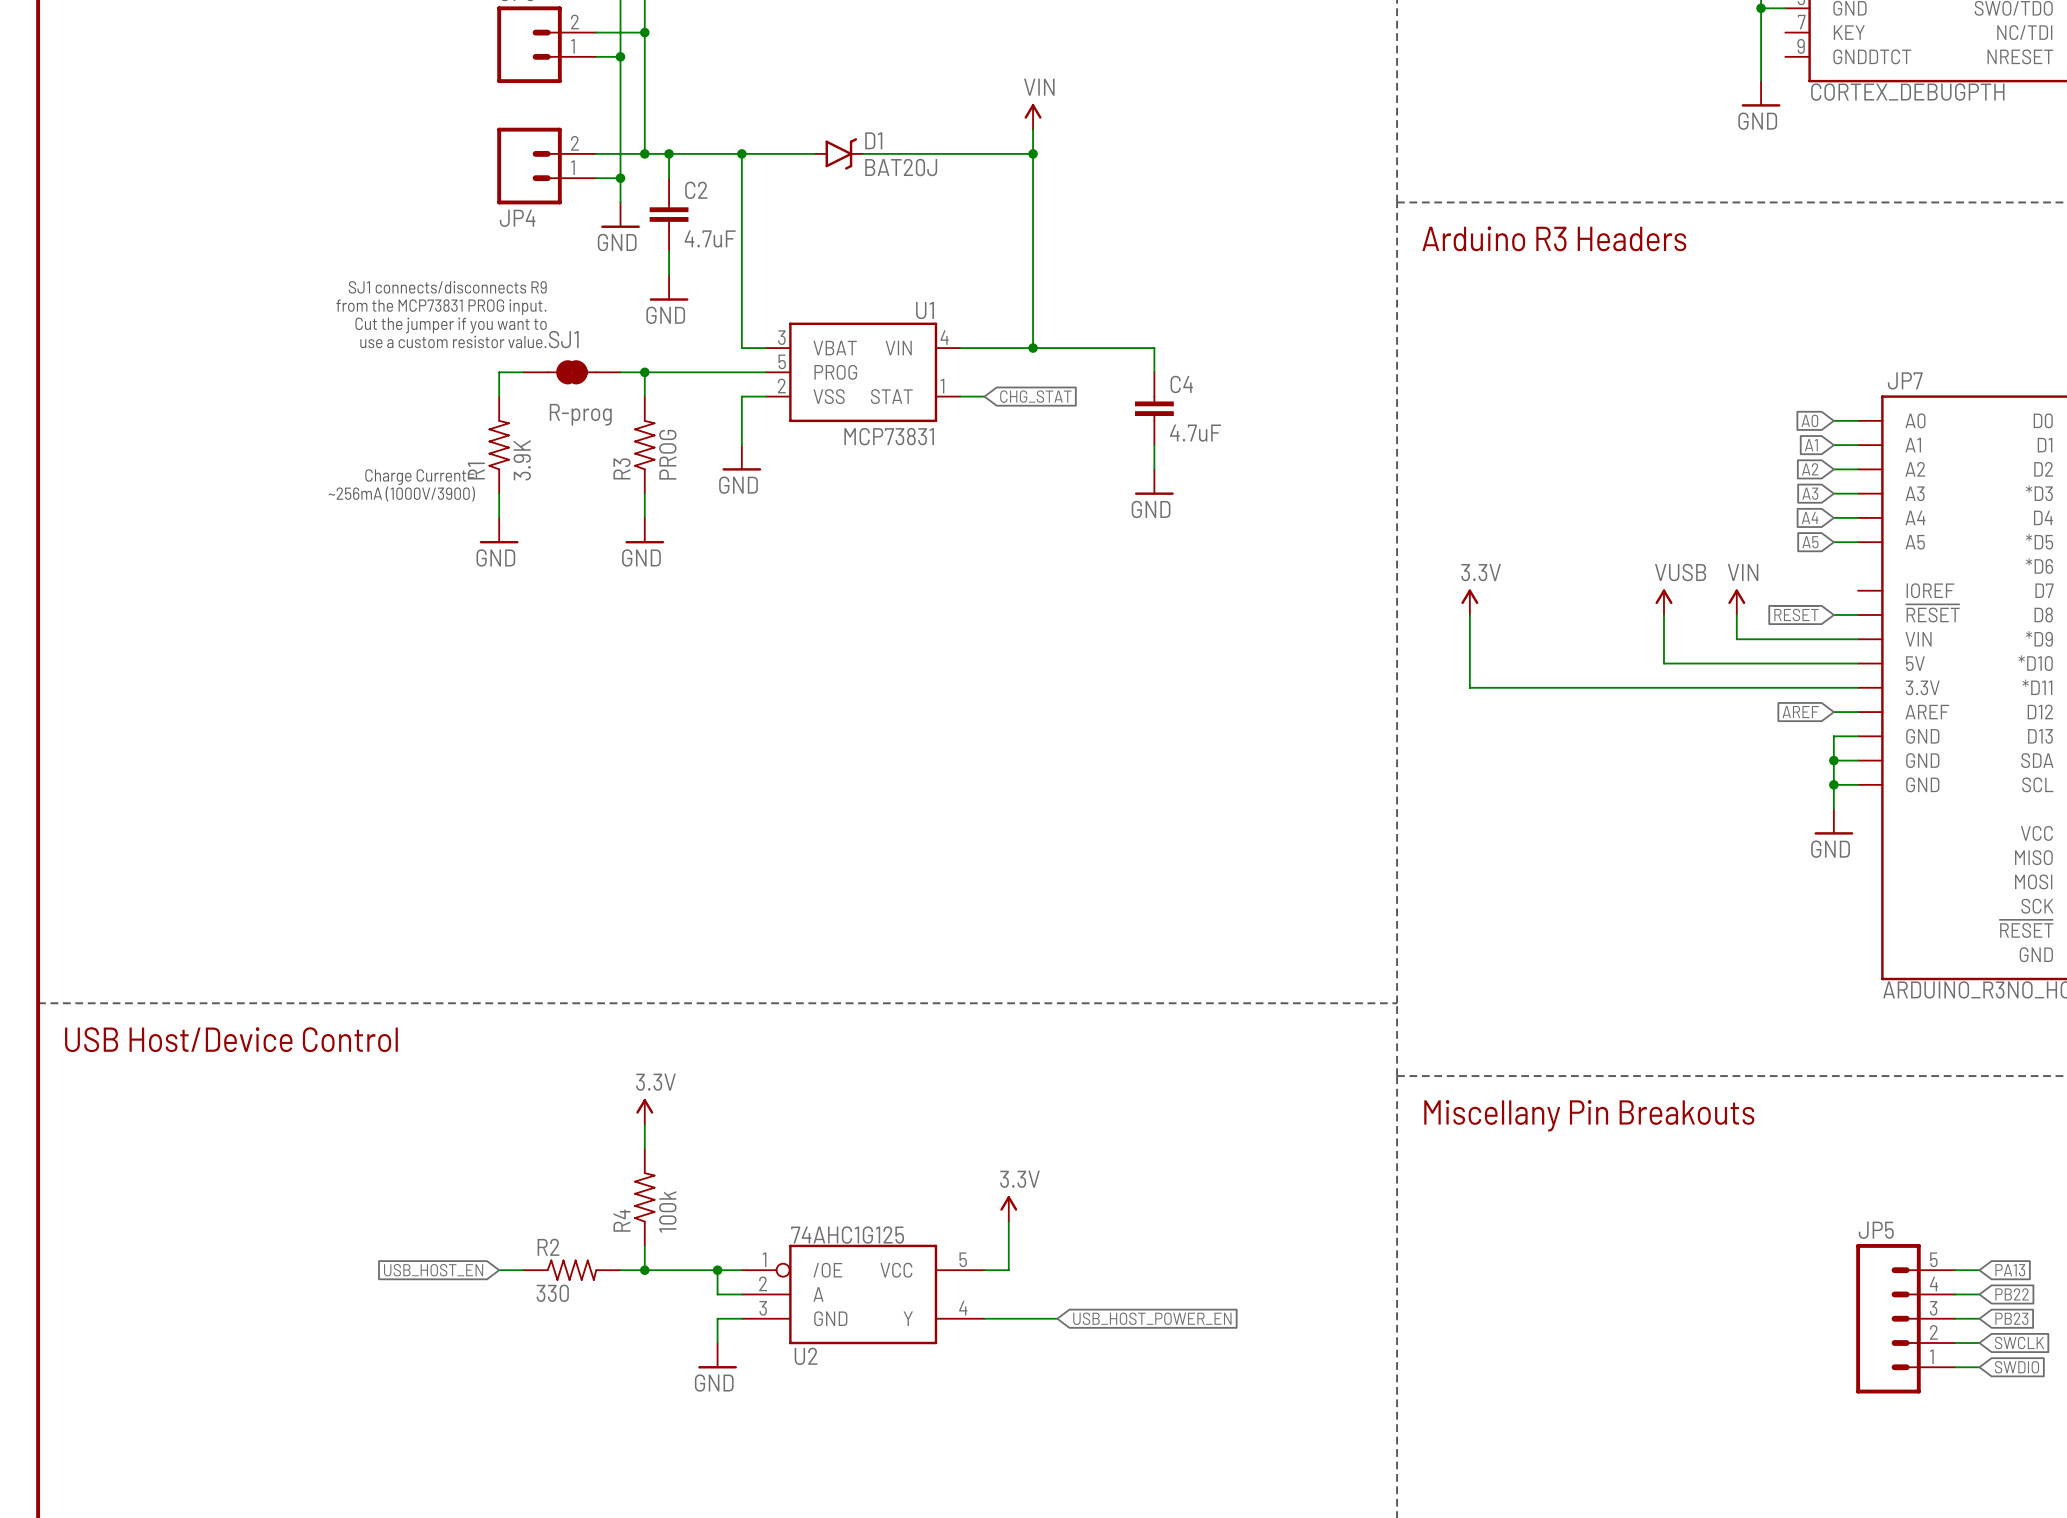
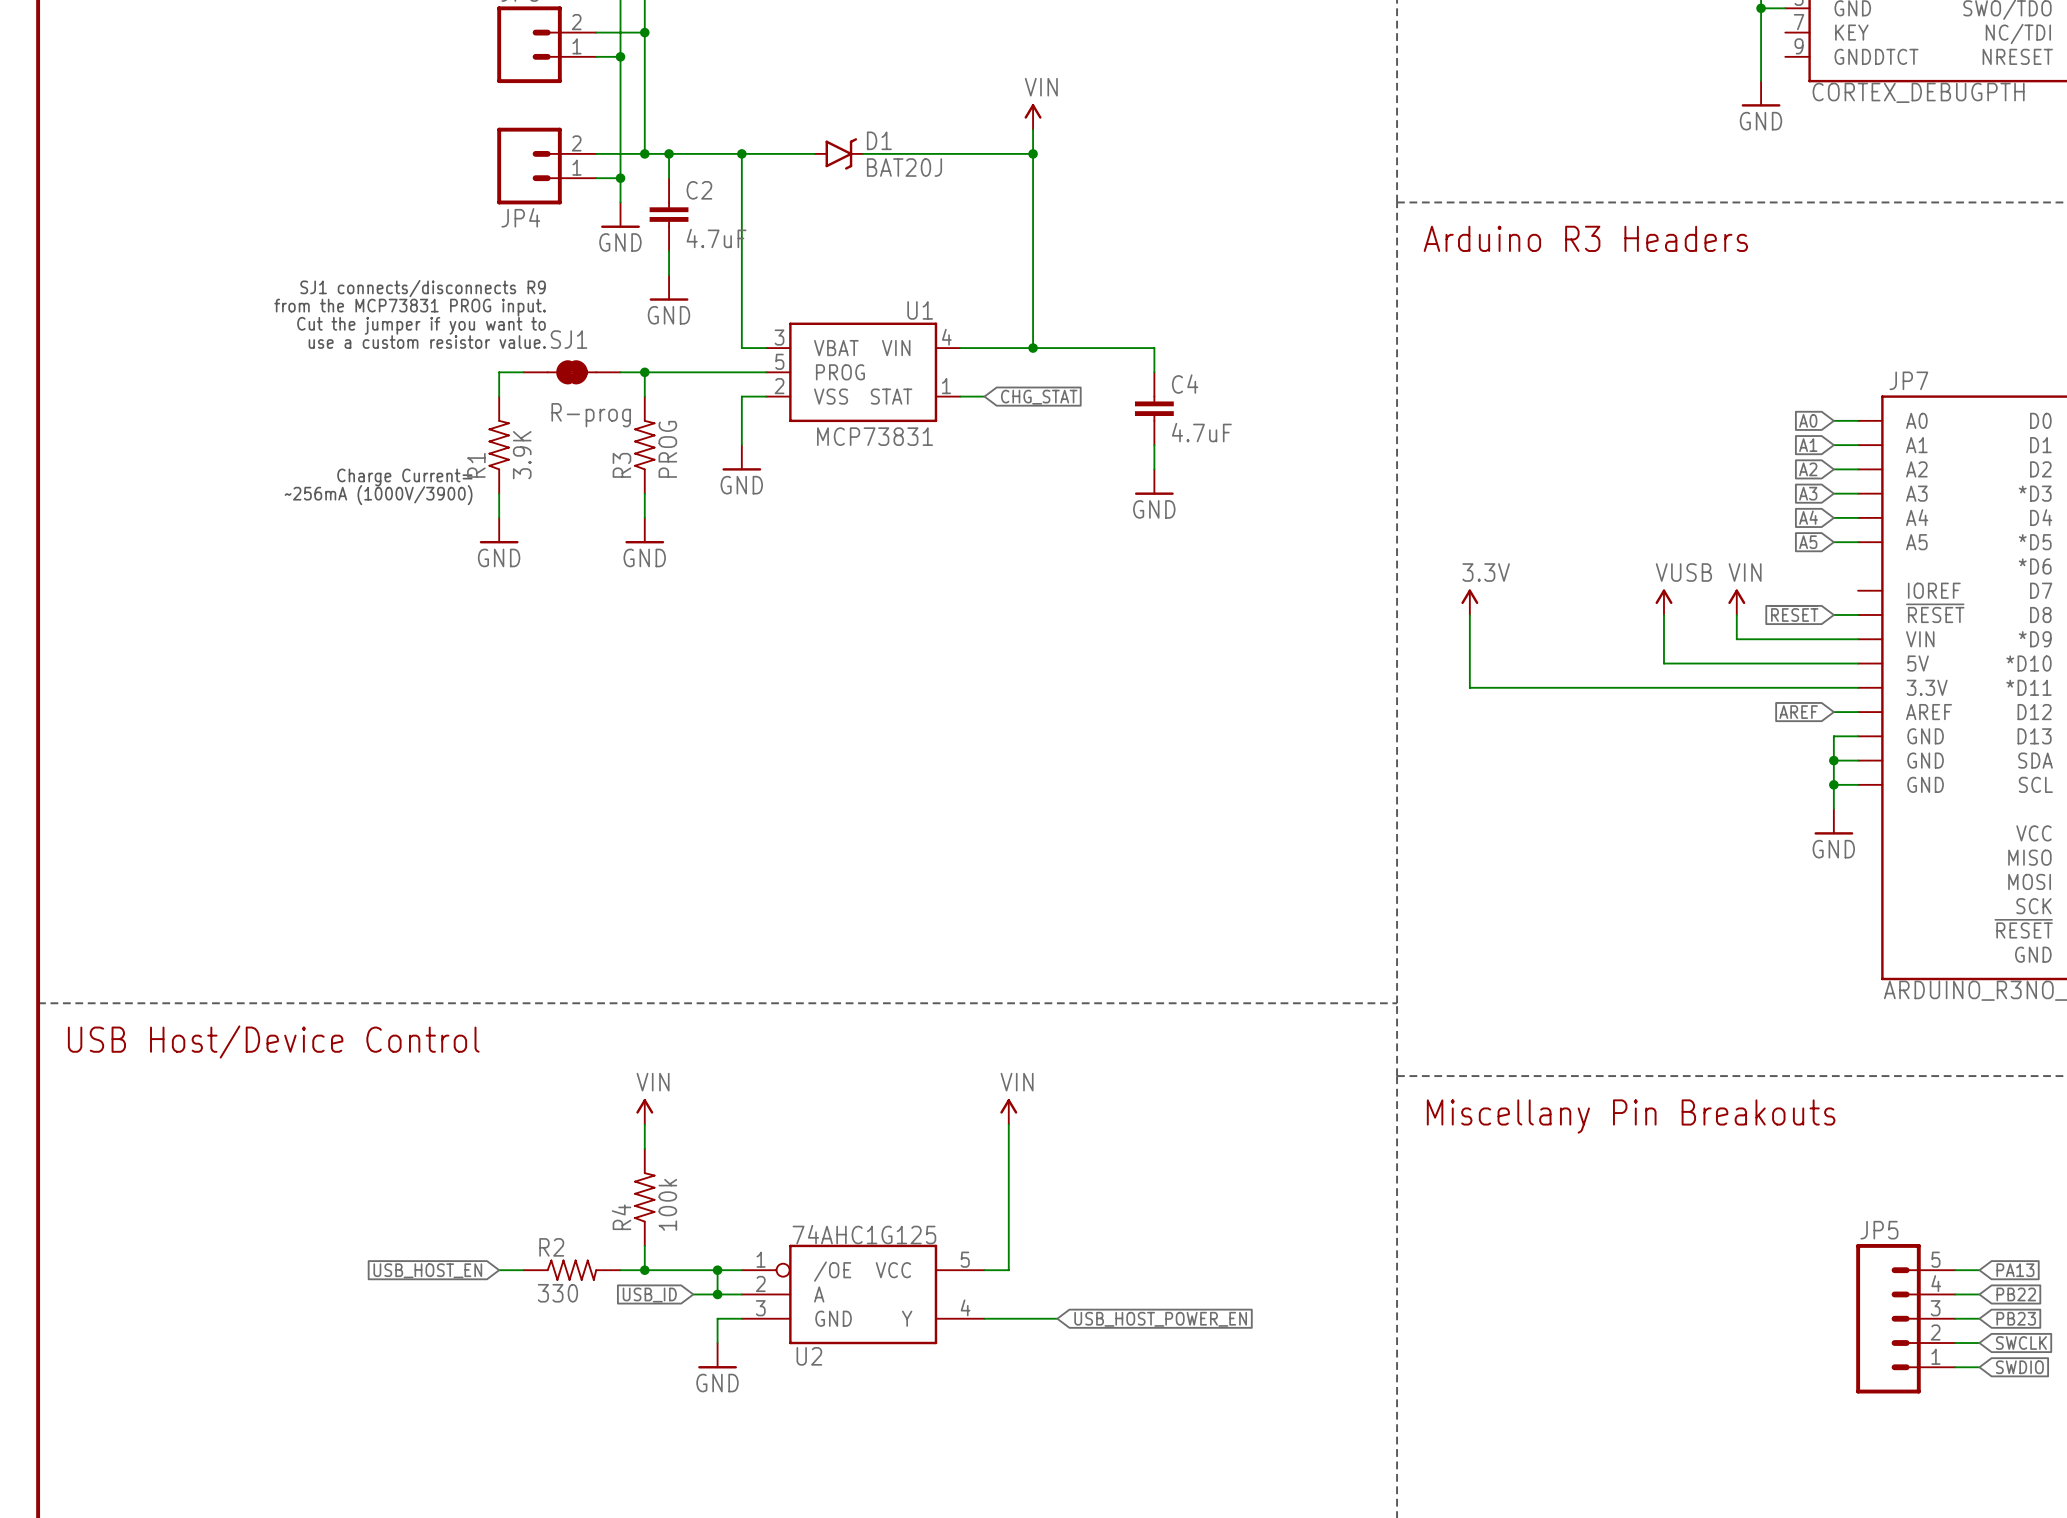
power symbol: 3.3V (644, 1111) -> VIN (644, 1111)
power symbol: none -> VIN (1008, 1111)
wire: none -> (1008, 1124) (1008, 1221)
power symbol: 3.3V (1008, 1208) -> none
global label: none -> USB_ID (649, 1295)
wire: none -> (693, 1294) (717, 1294)
junction: none -> (717, 1294)

